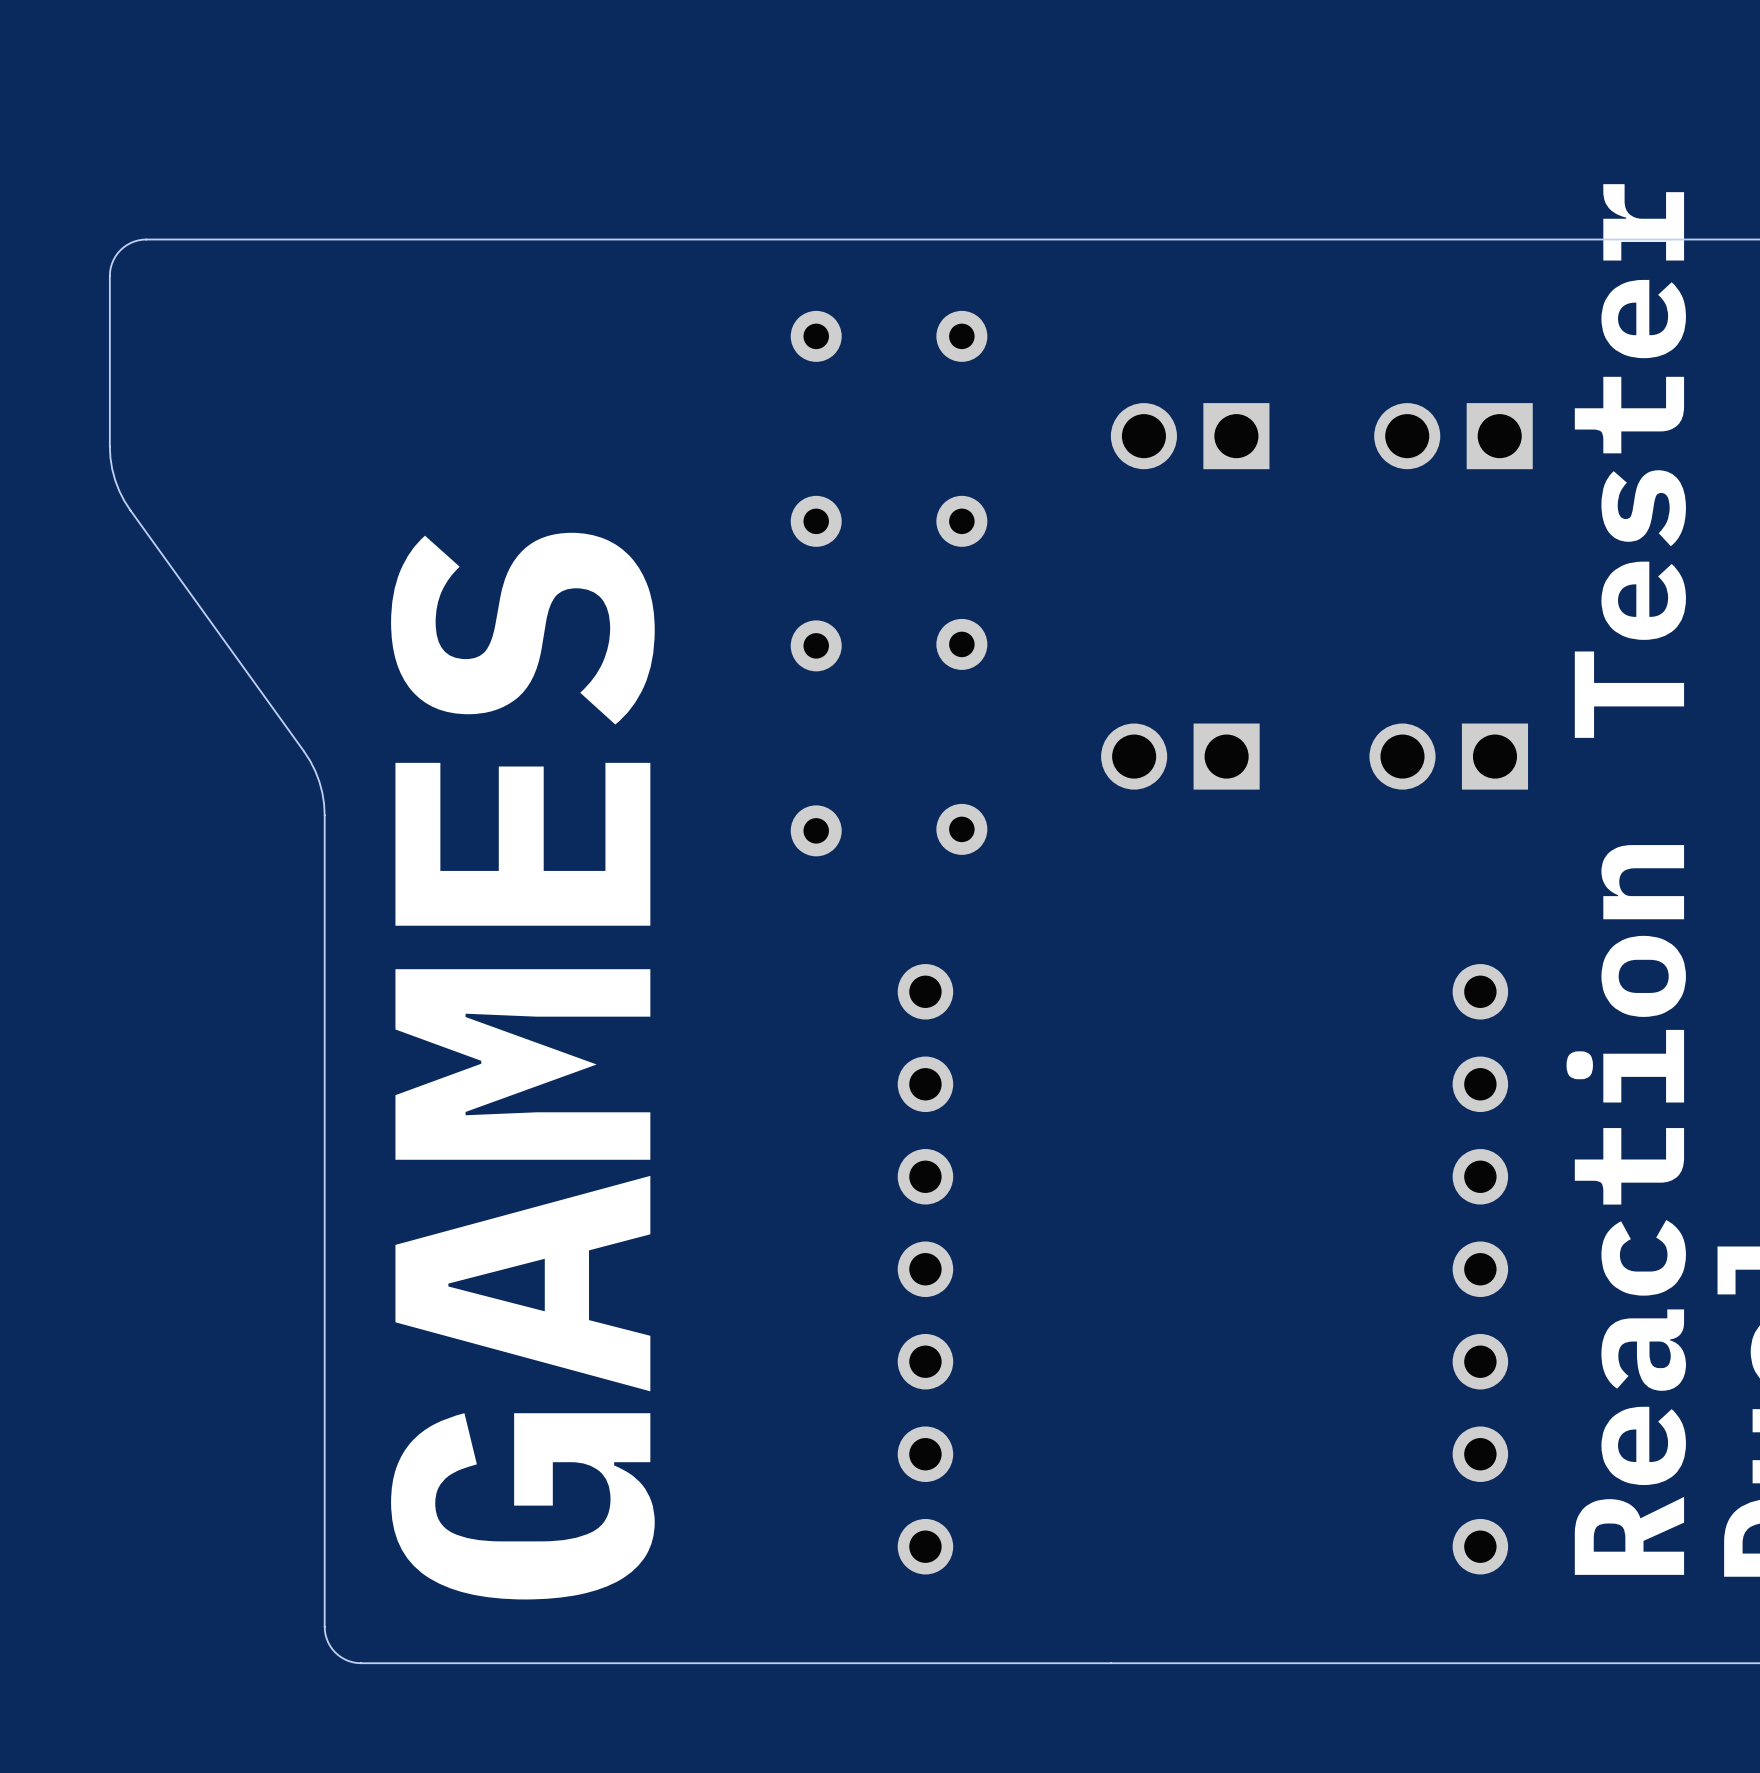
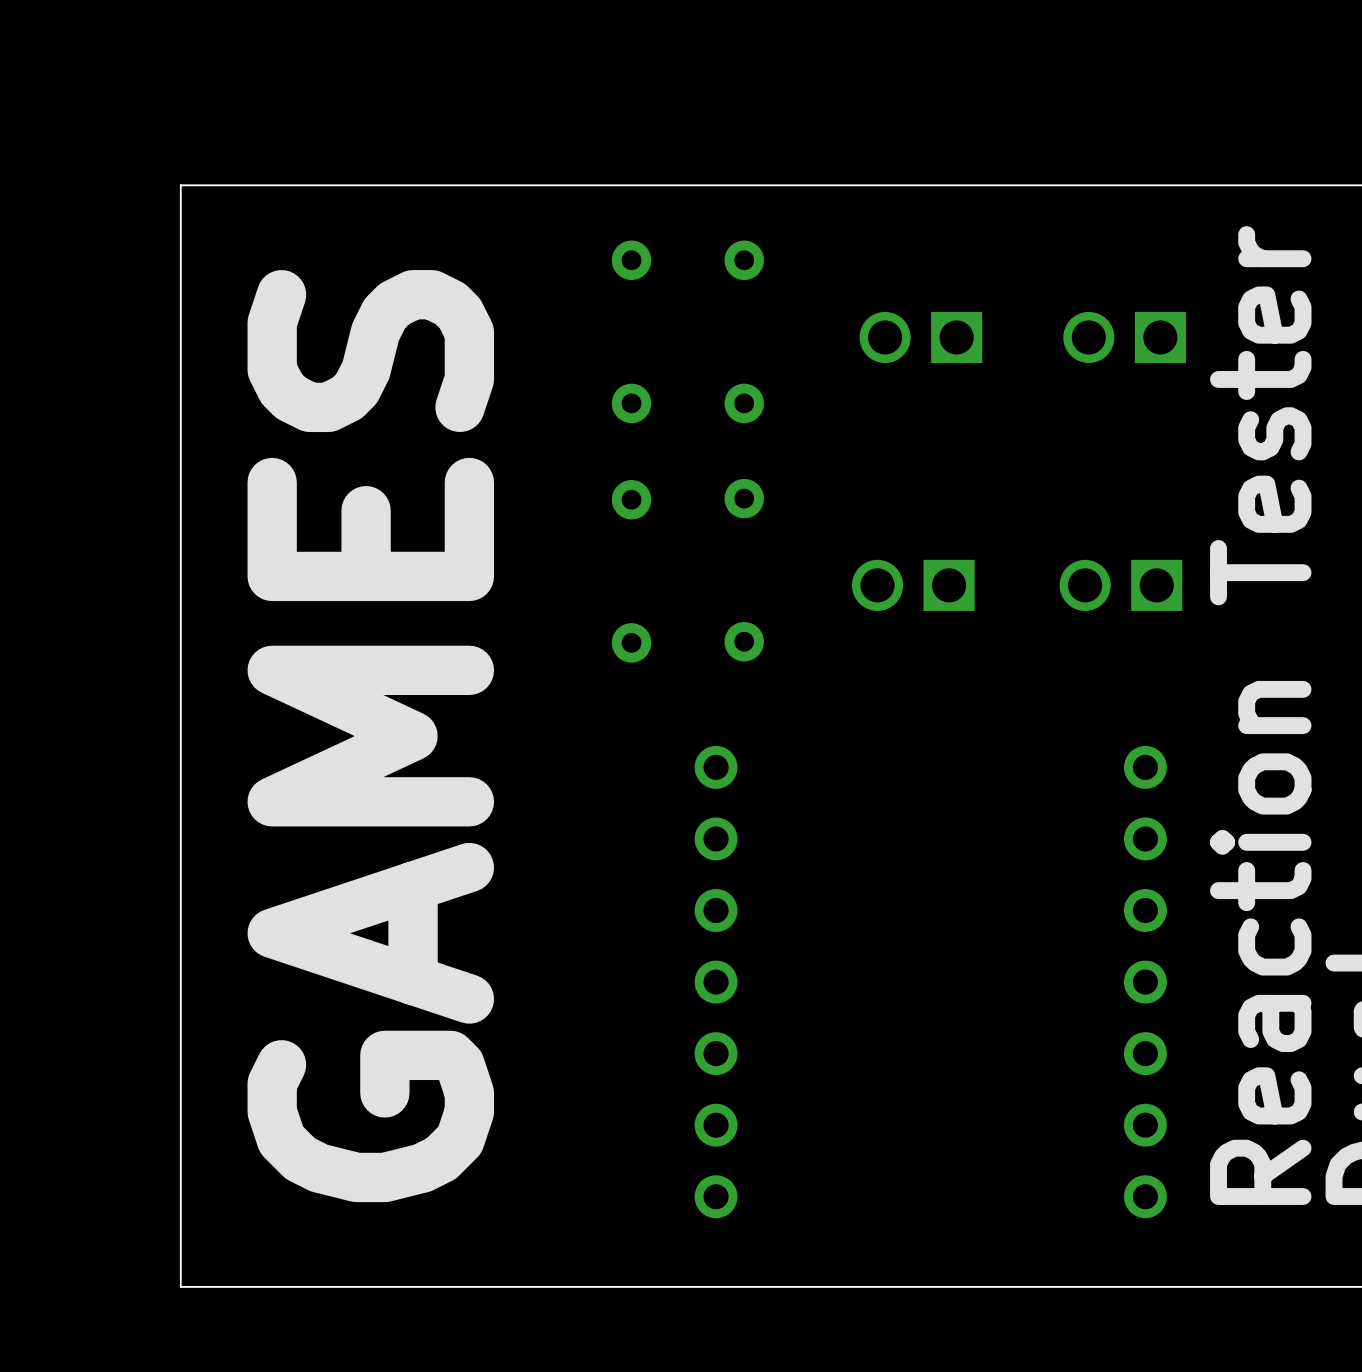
board edge: (233, 239) (142, 239) (126, 245) (115, 256) (109, 275) (110, 457) (115, 480) (124, 500) (304, 751) (315, 771) (322, 792) (324, 815) (324, 1626) (326, 1638) (335, 1652) (349, 1661) (361, 1663) -> (180, 185) (180, 1286) (279, 1286)
text position: GAMES (522, 1066) -> GAMES (370, 736)

